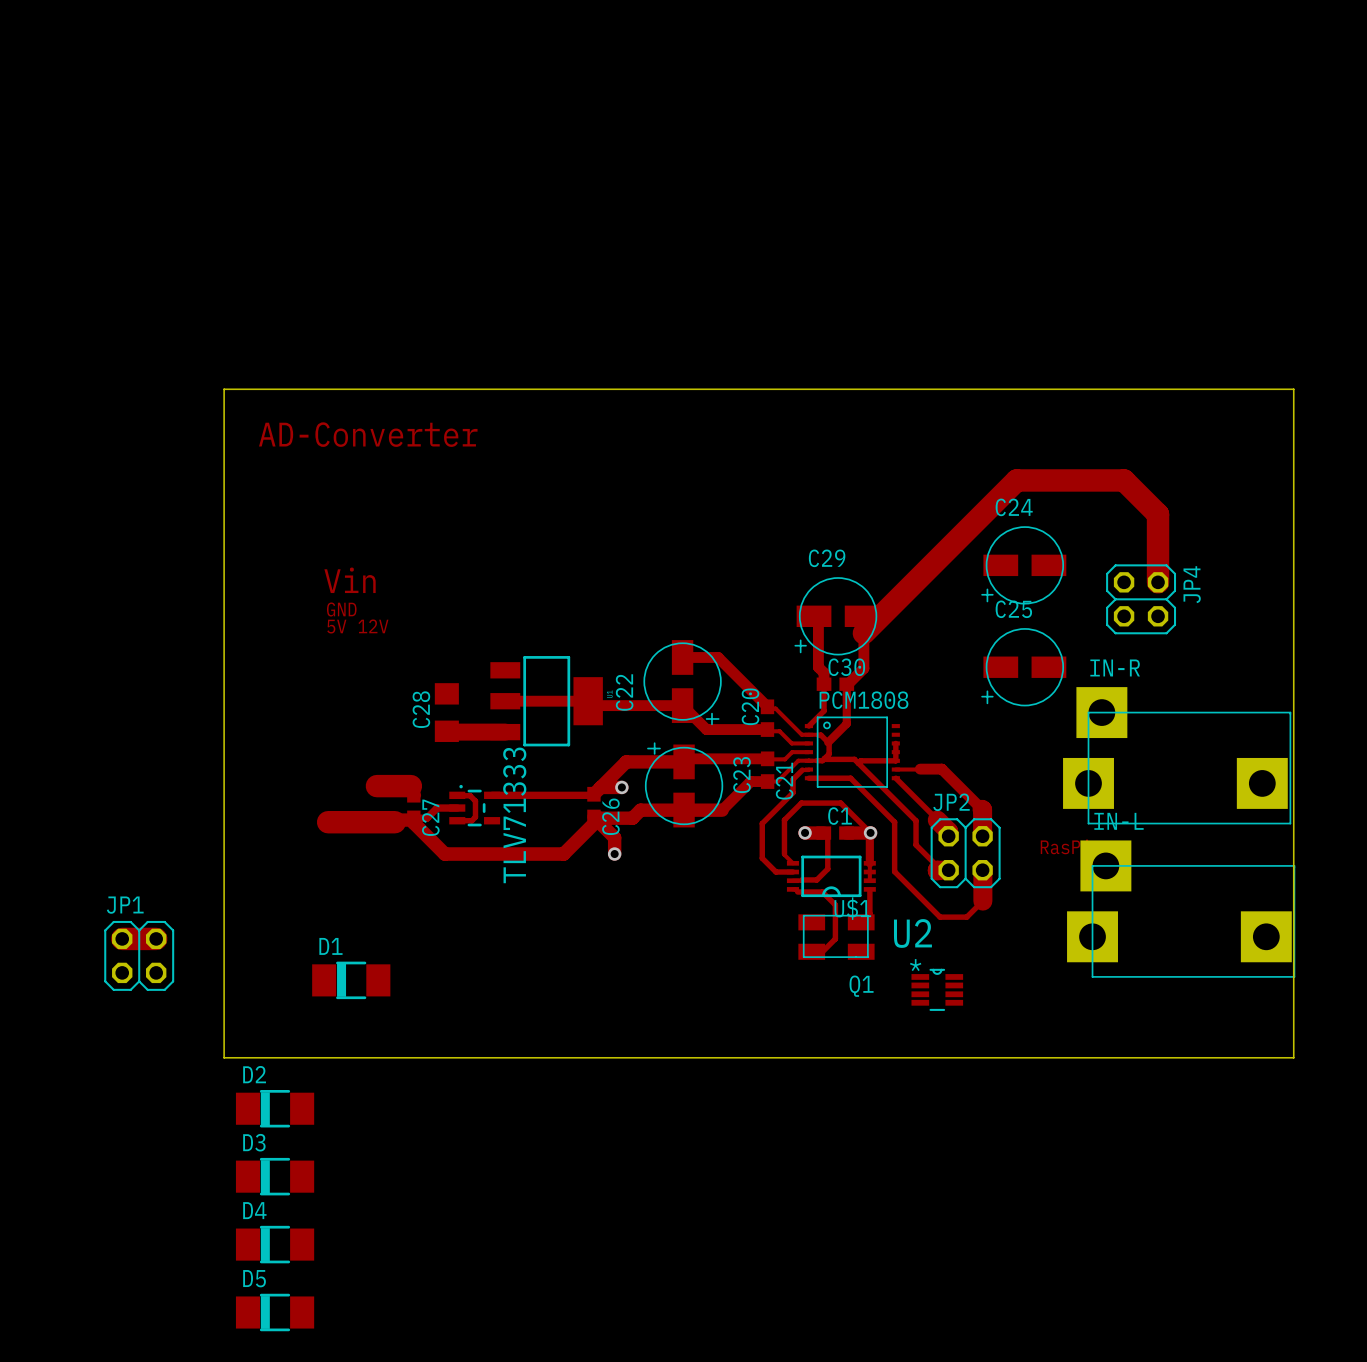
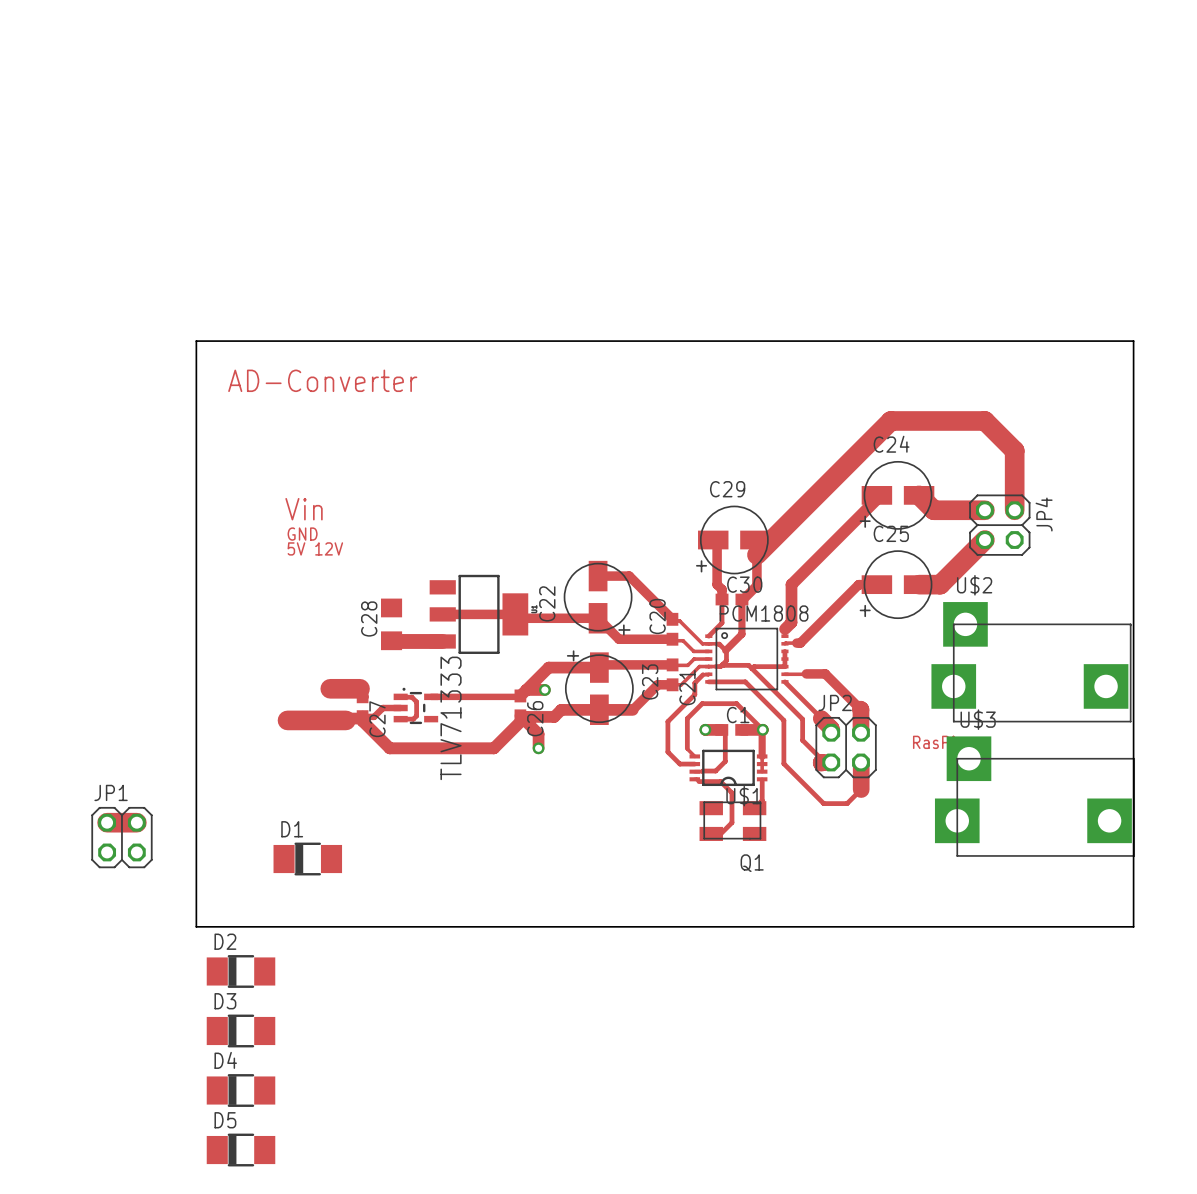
track: none -> (876, 495) (876, 499) (791, 584) (791, 622) (785, 629) (785, 636)
track: none -> (919, 495) (933, 510) (984, 510)
track: none -> (984, 540) (940, 584) (919, 584)
track: none -> (876, 584) (858, 584) (800, 643) (784, 643)
IN-R name: IN-R (1115, 667) -> U$2 (974, 585)
IN-L name: IN-L (1119, 821) -> U$3 (978, 719)
U2: (937, 989) -> none

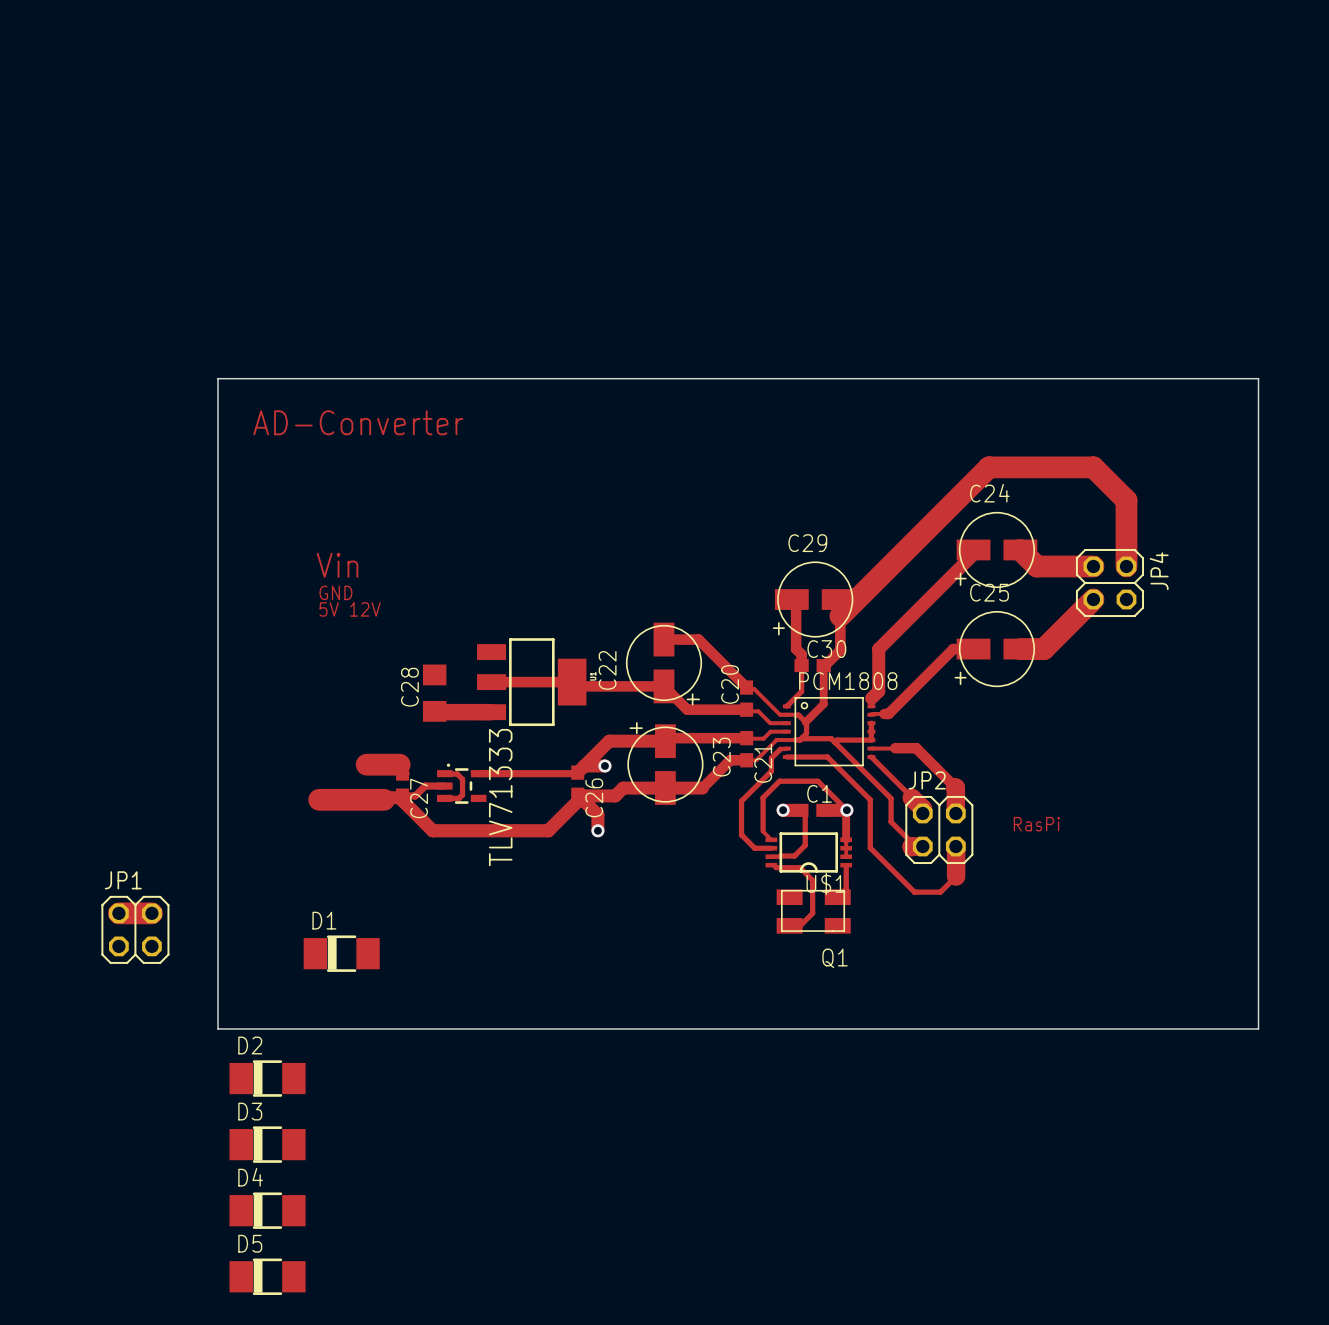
U$2: (1031, 662) -> none
U$3: (1034, 796) -> none

